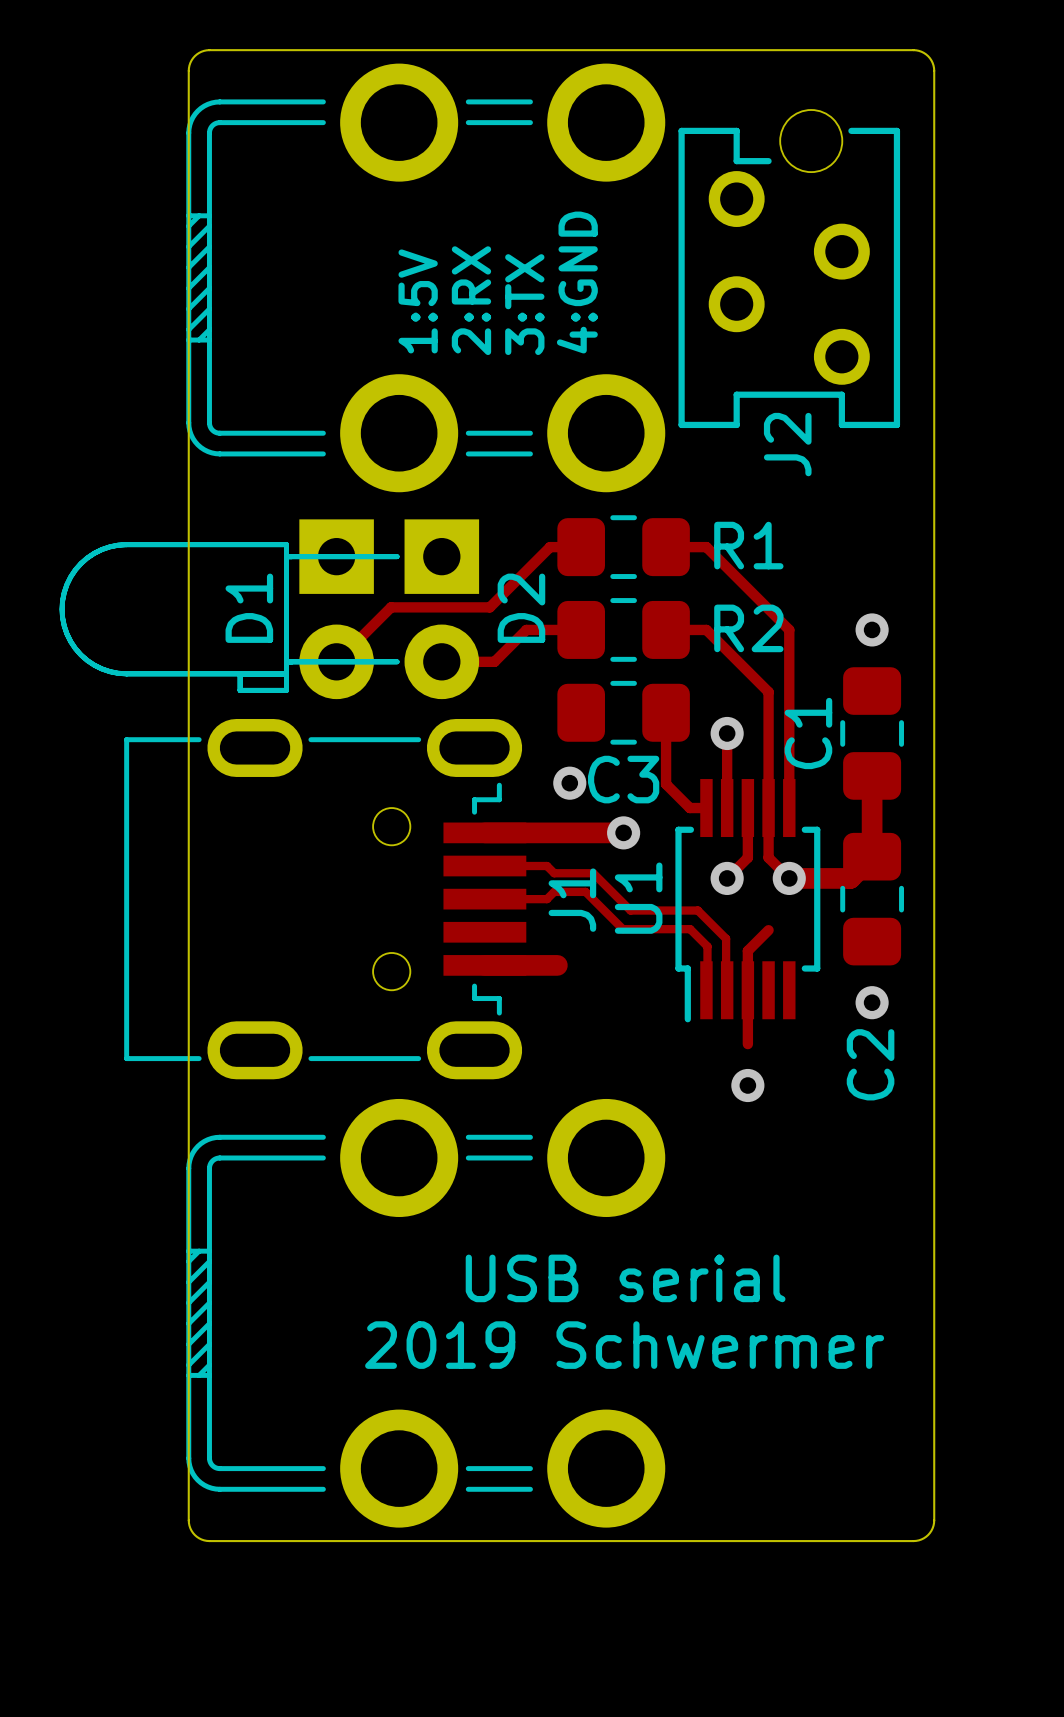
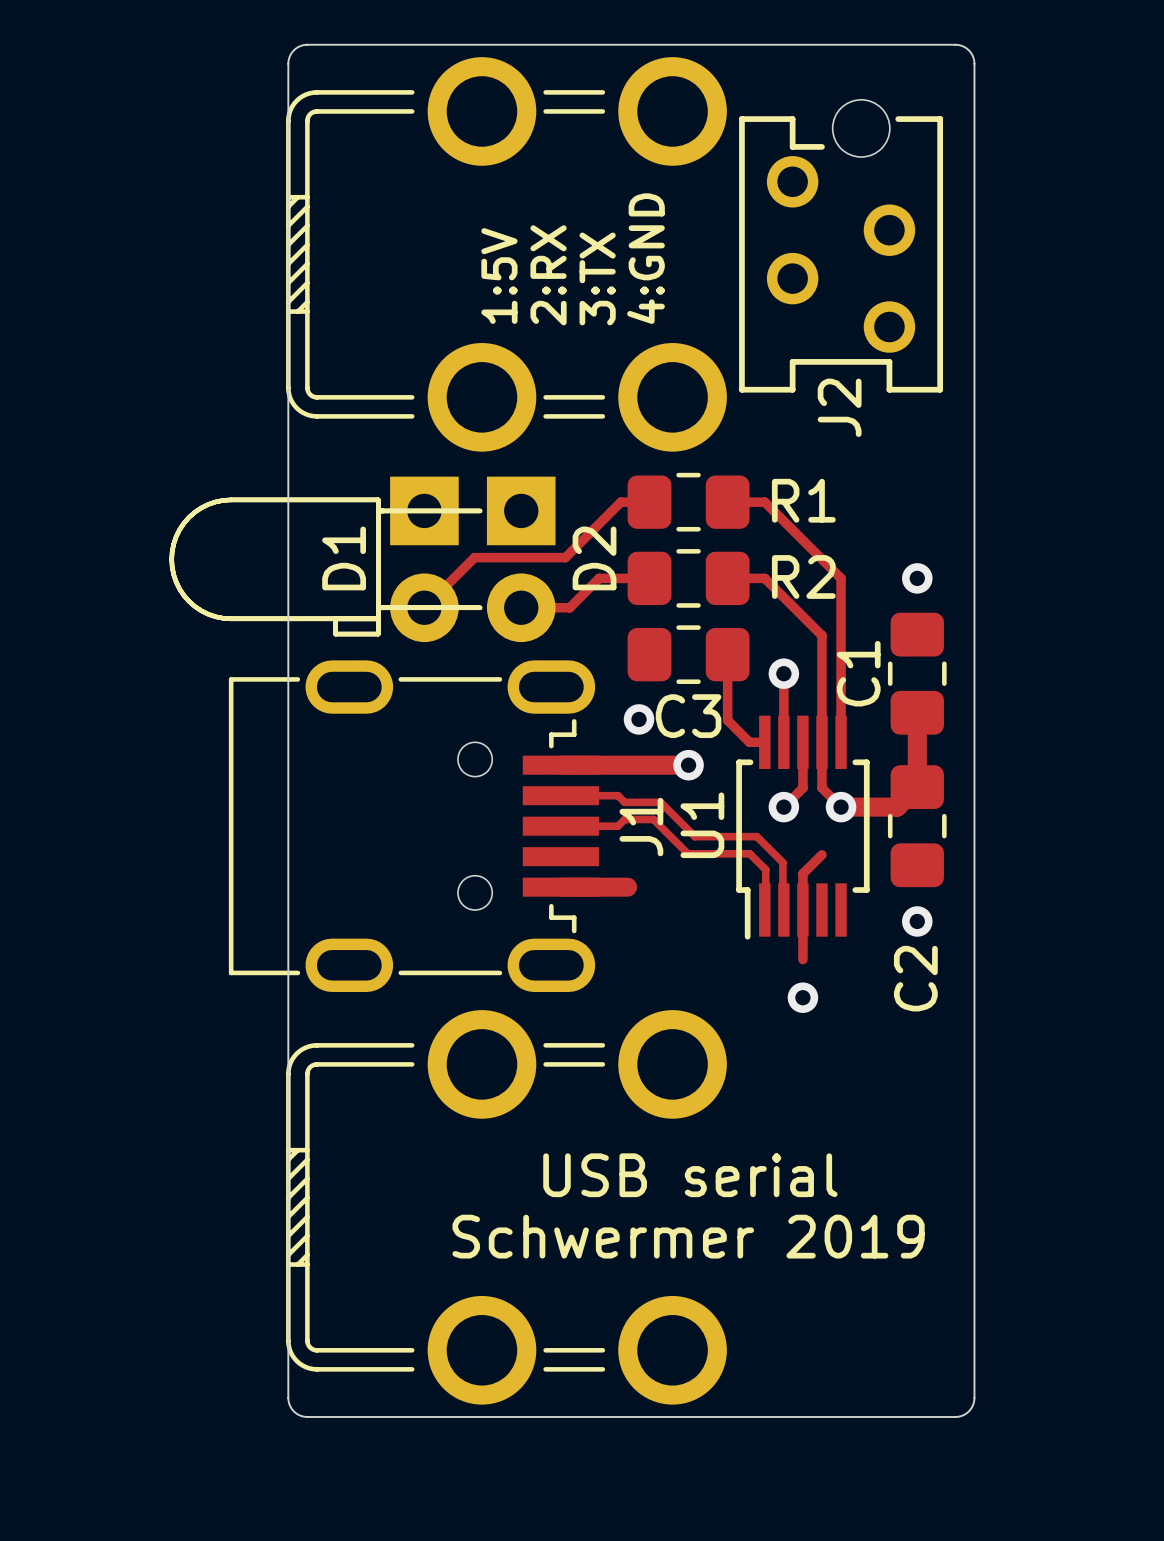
text: 2019 Schwermer (624, 1345) -> Schwermer 2019 (688, 1236)

